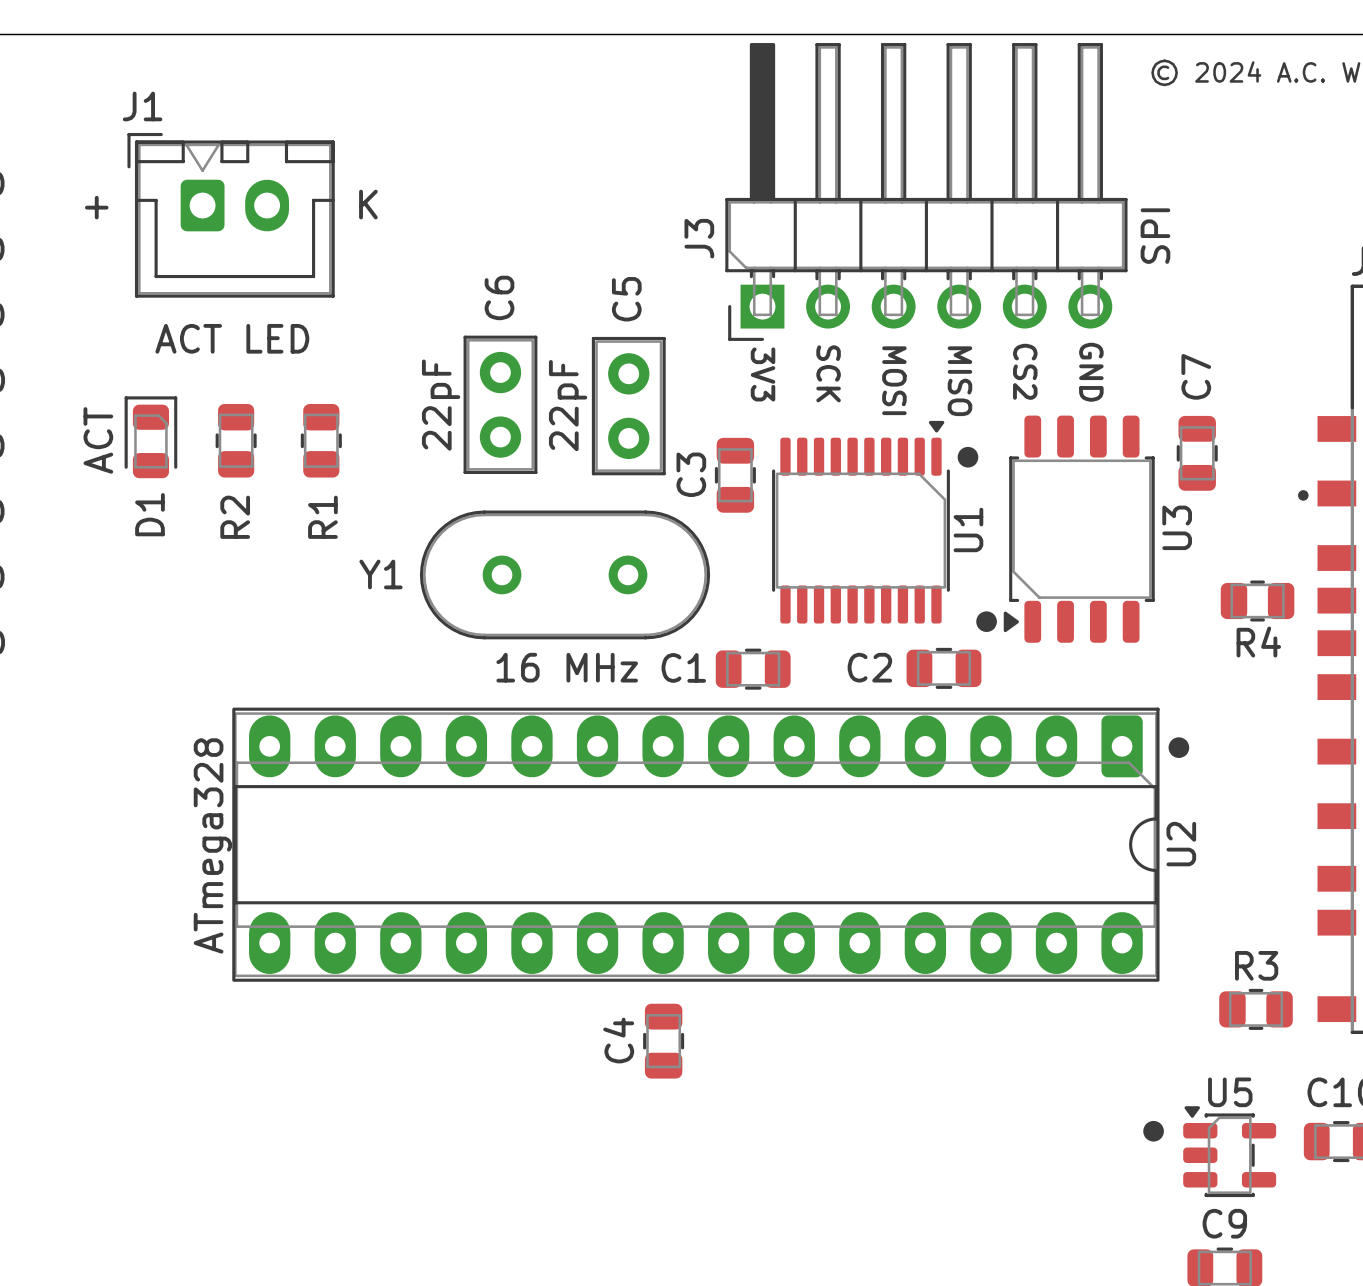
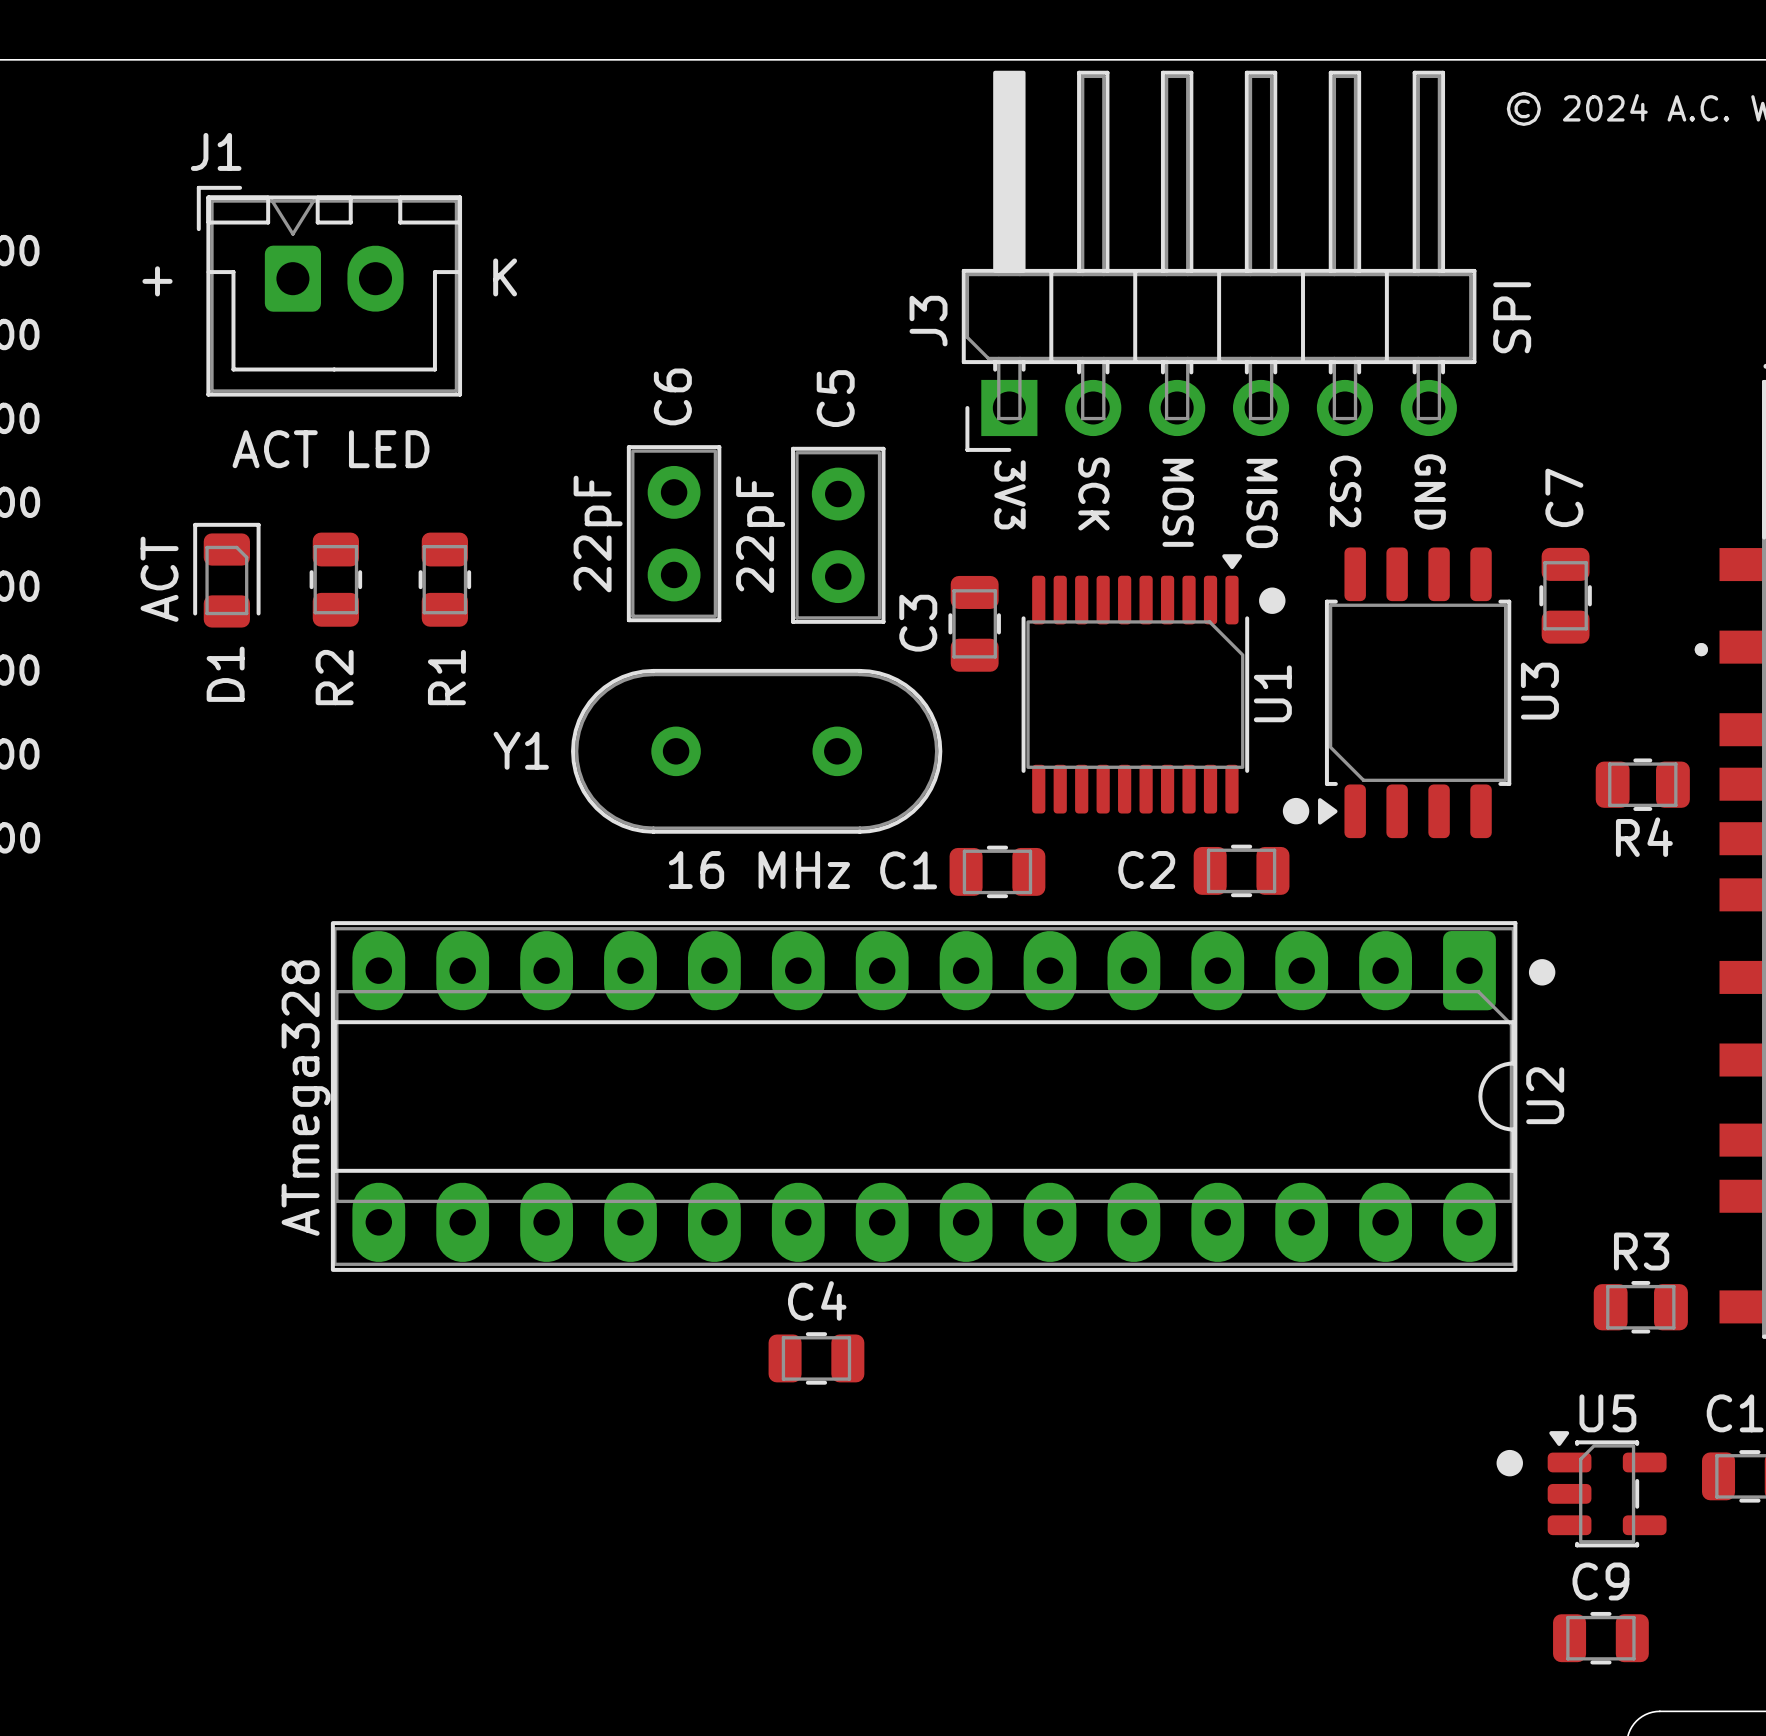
C4 rotation: 0° (663, 1041) -> 90° clockwise (816, 1358)
C4 position: (663, 1041) -> (816, 1358)

